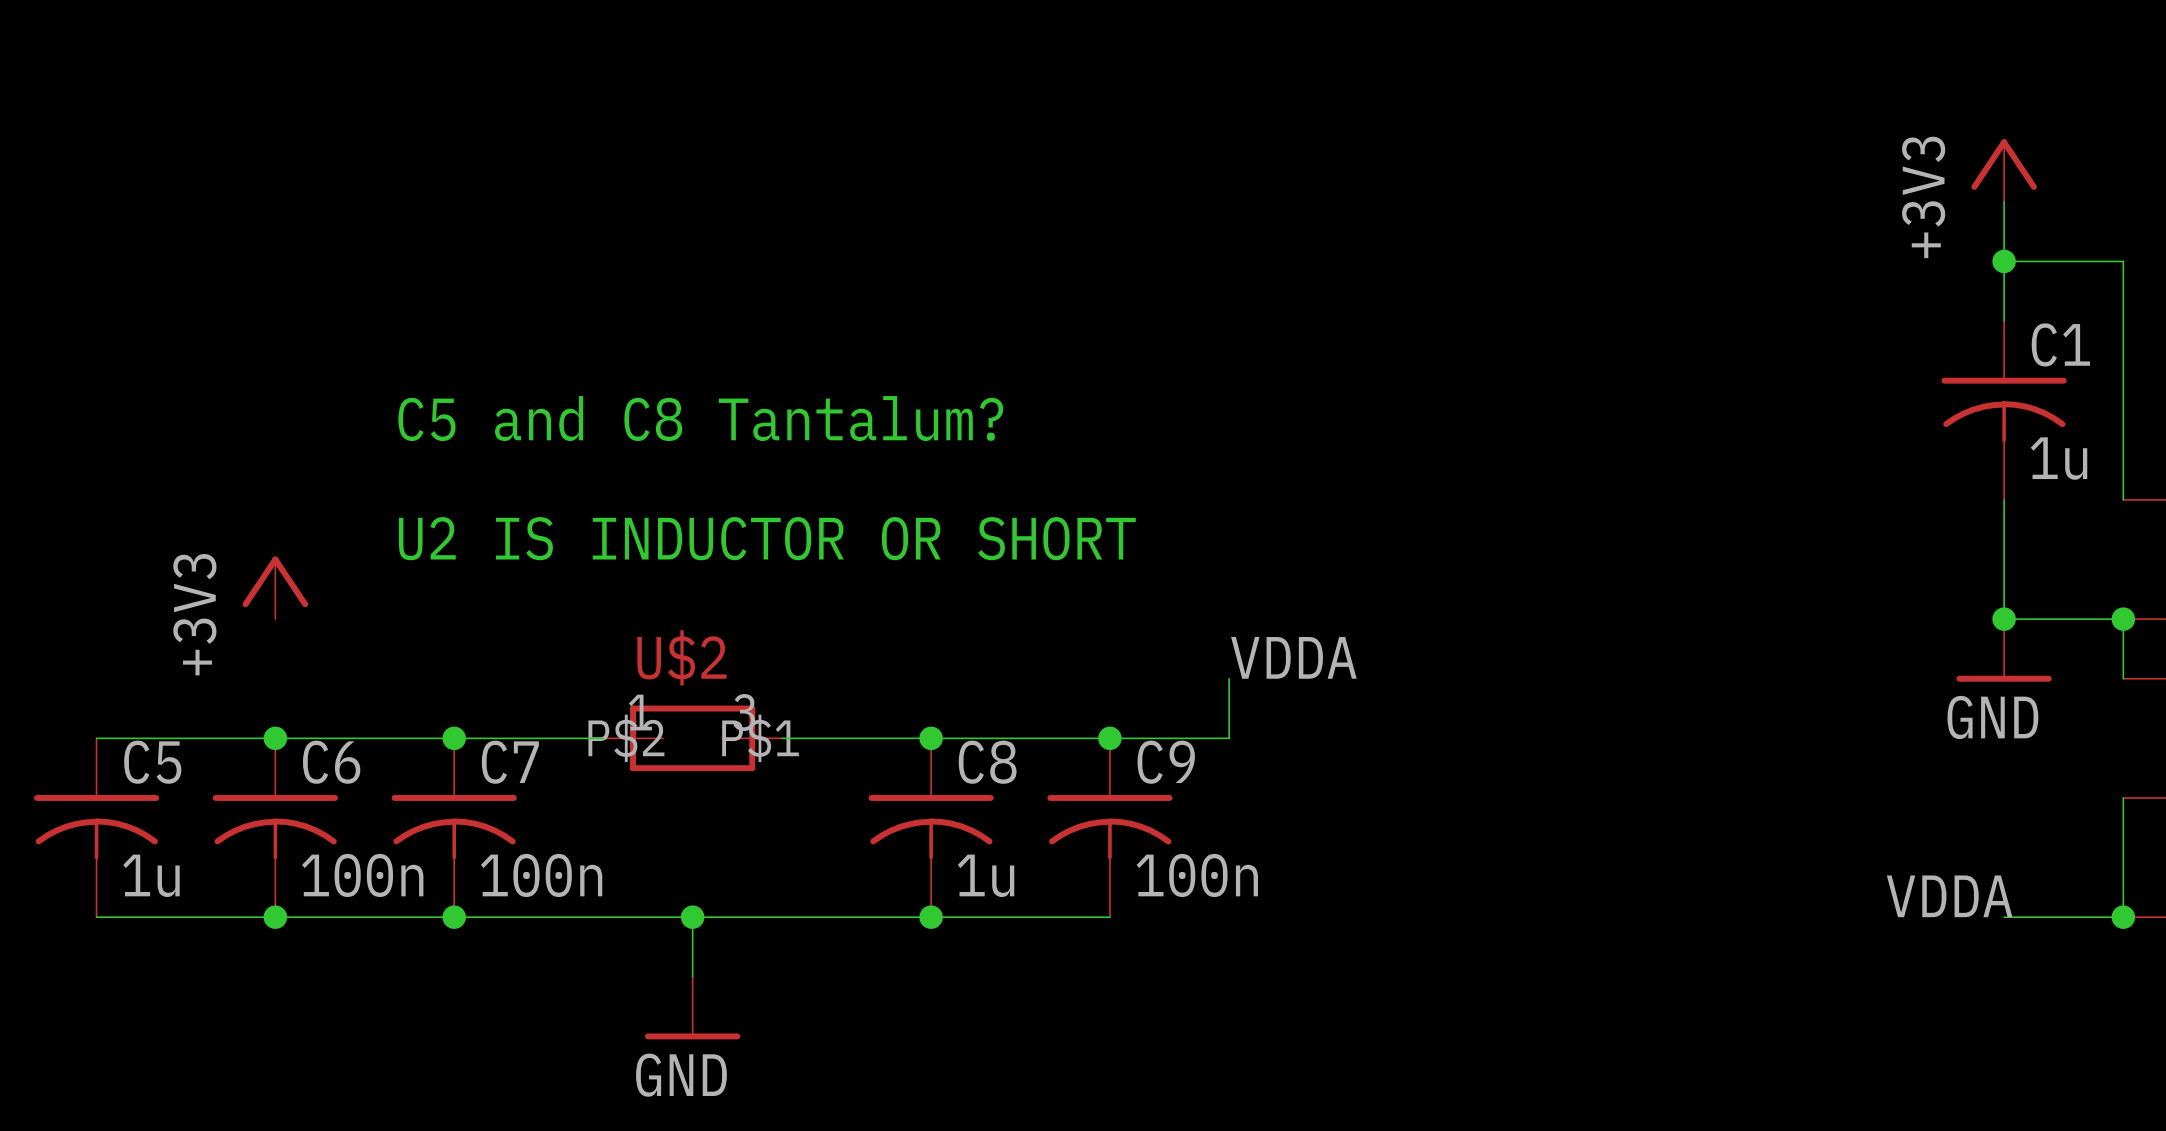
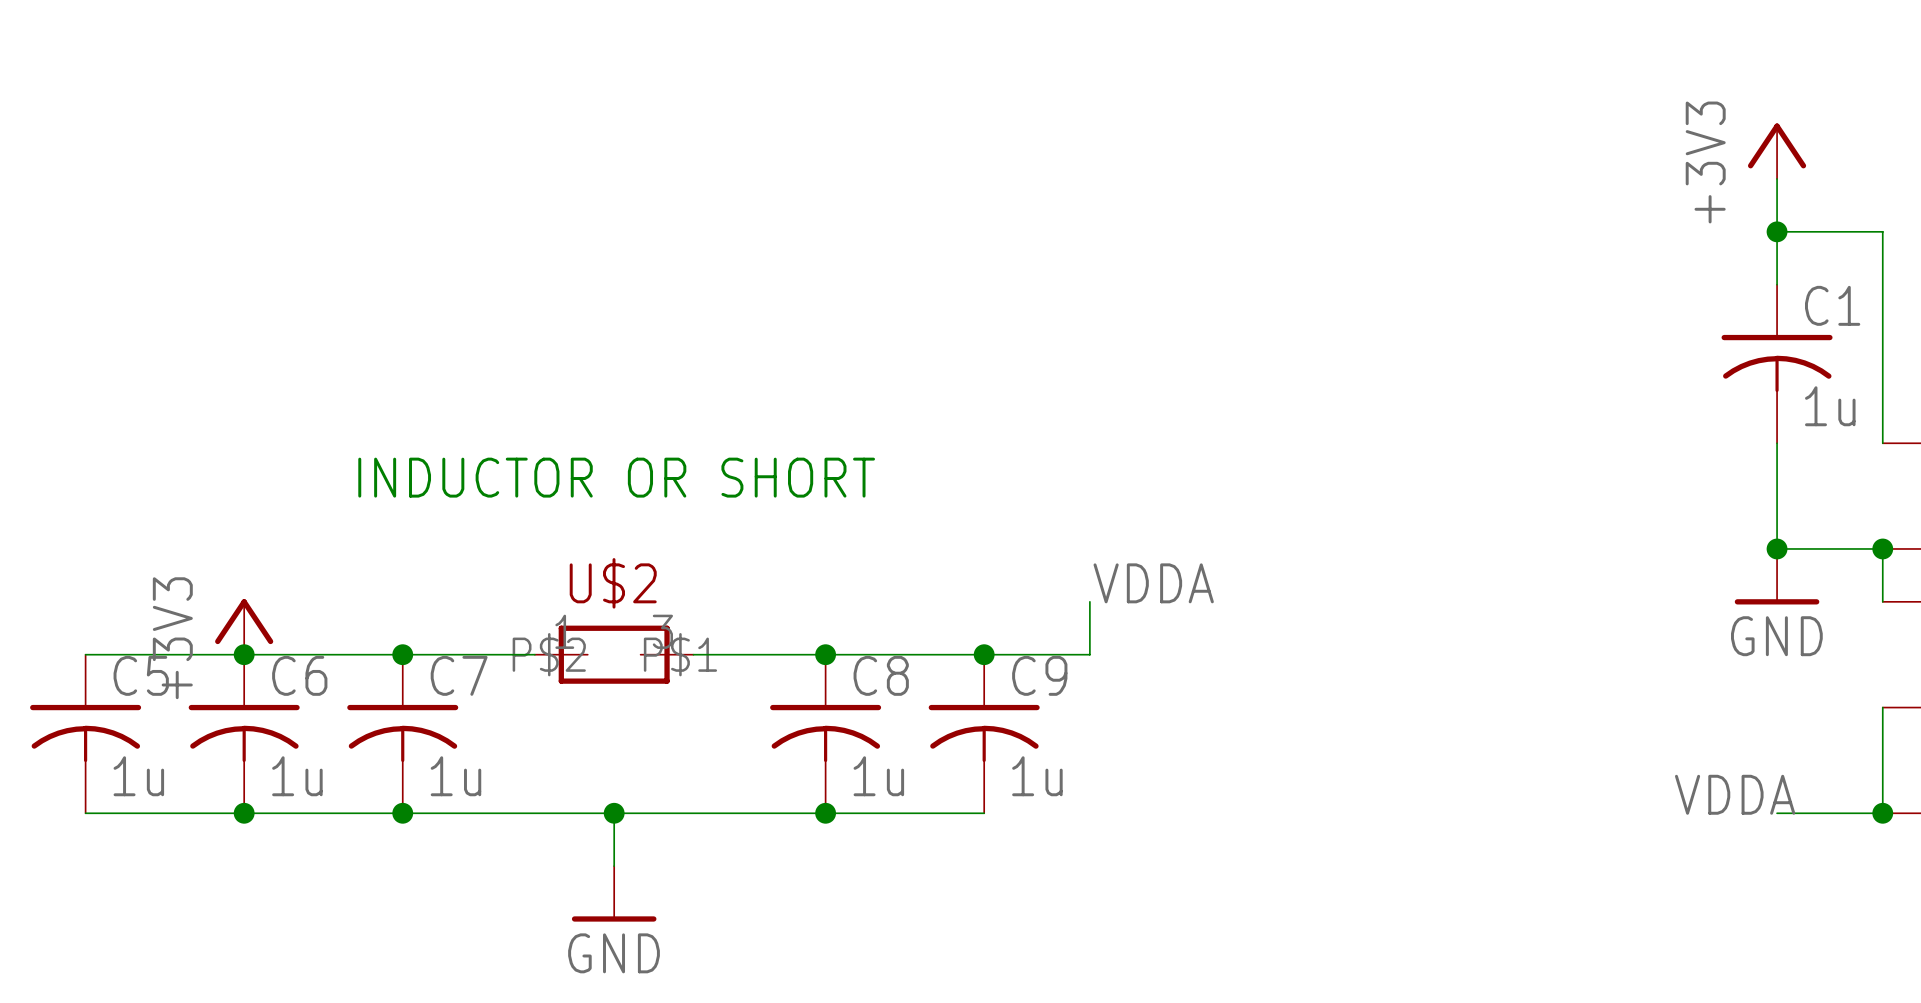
text: C5 and C8 Tantalum? (700, 418) -> none
text: U2 IS INDUCTOR OR SHORT (767, 538) -> INDUCTOR OR SHORT (616, 477)
power symbol position: +3V3 (275, 587) -> +3V3 (244, 626)
C6 value: 100n (362, 875) -> 1u (297, 776)
C7 value: 100n (541, 875) -> 1u (455, 776)
C9 value: 100n (1197, 875) -> 1u (1037, 776)

